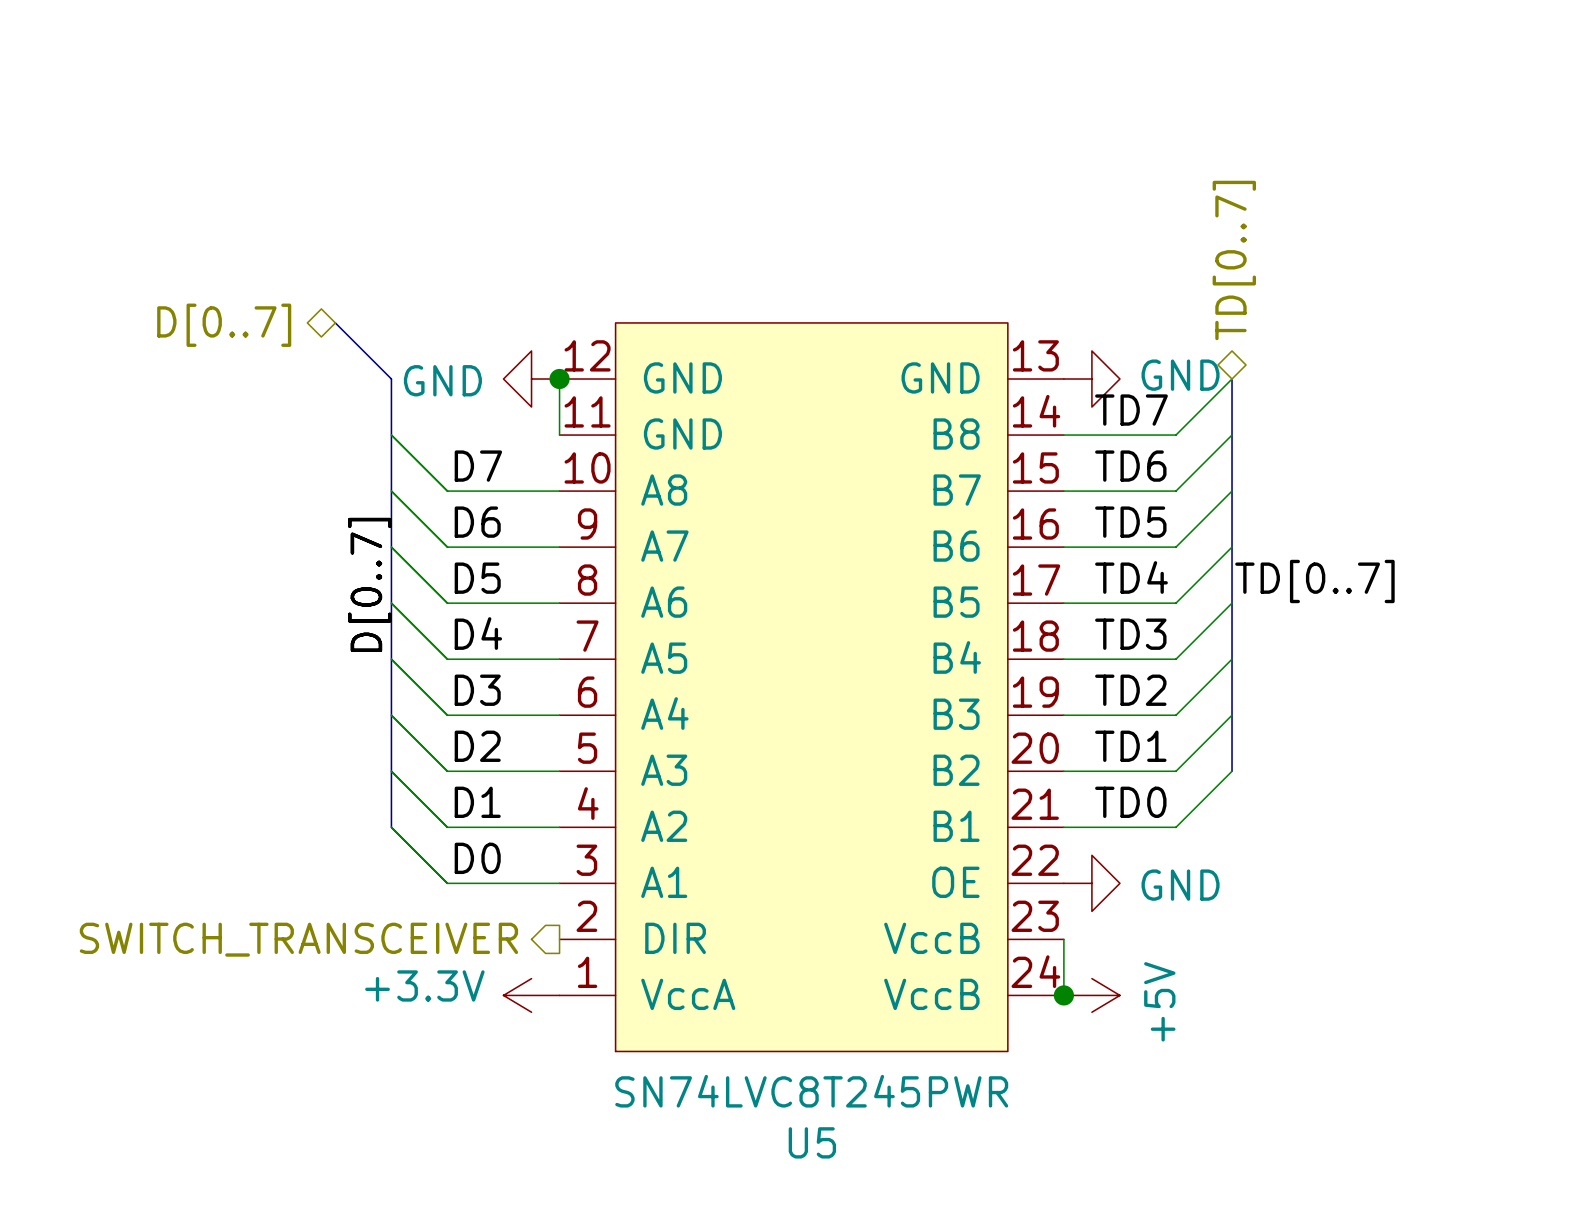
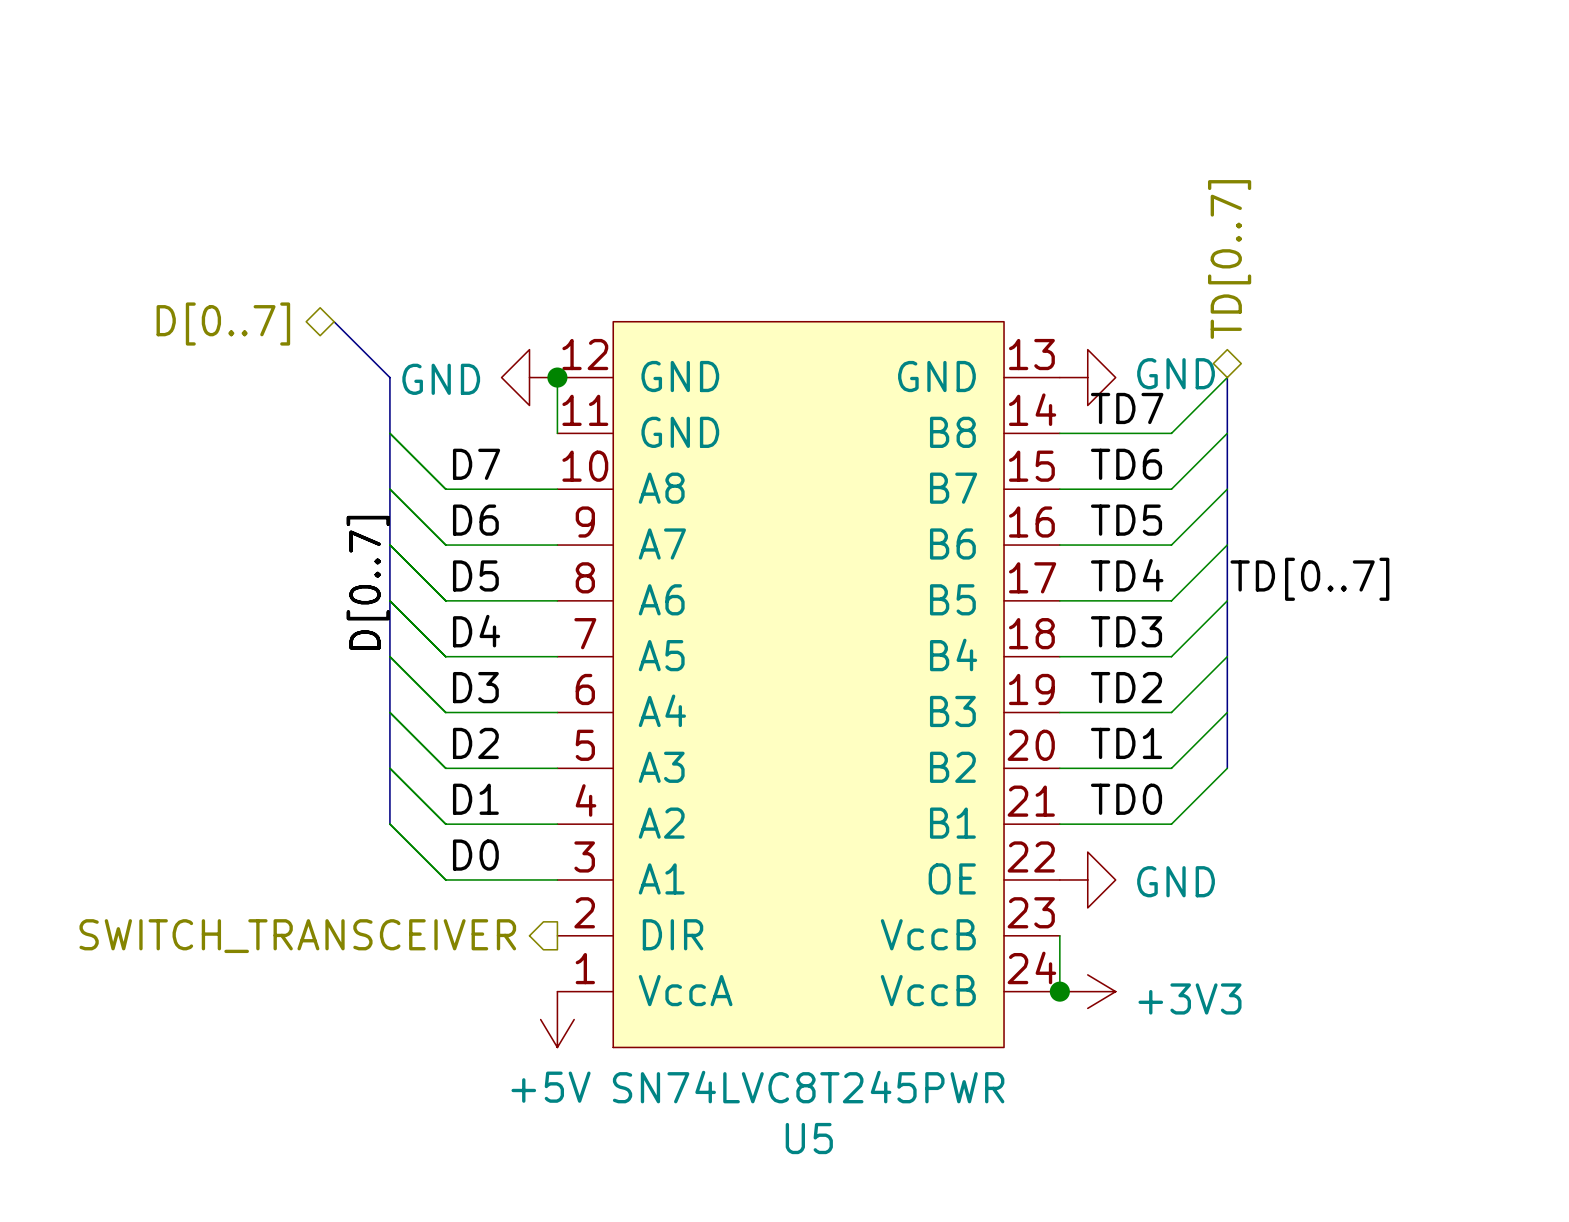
power symbol: +3.3V (531, 995) -> none
power symbol: +5V (1091, 995) -> +3V3 (1087, 991)
power symbol: none -> +5V (557, 1019)

